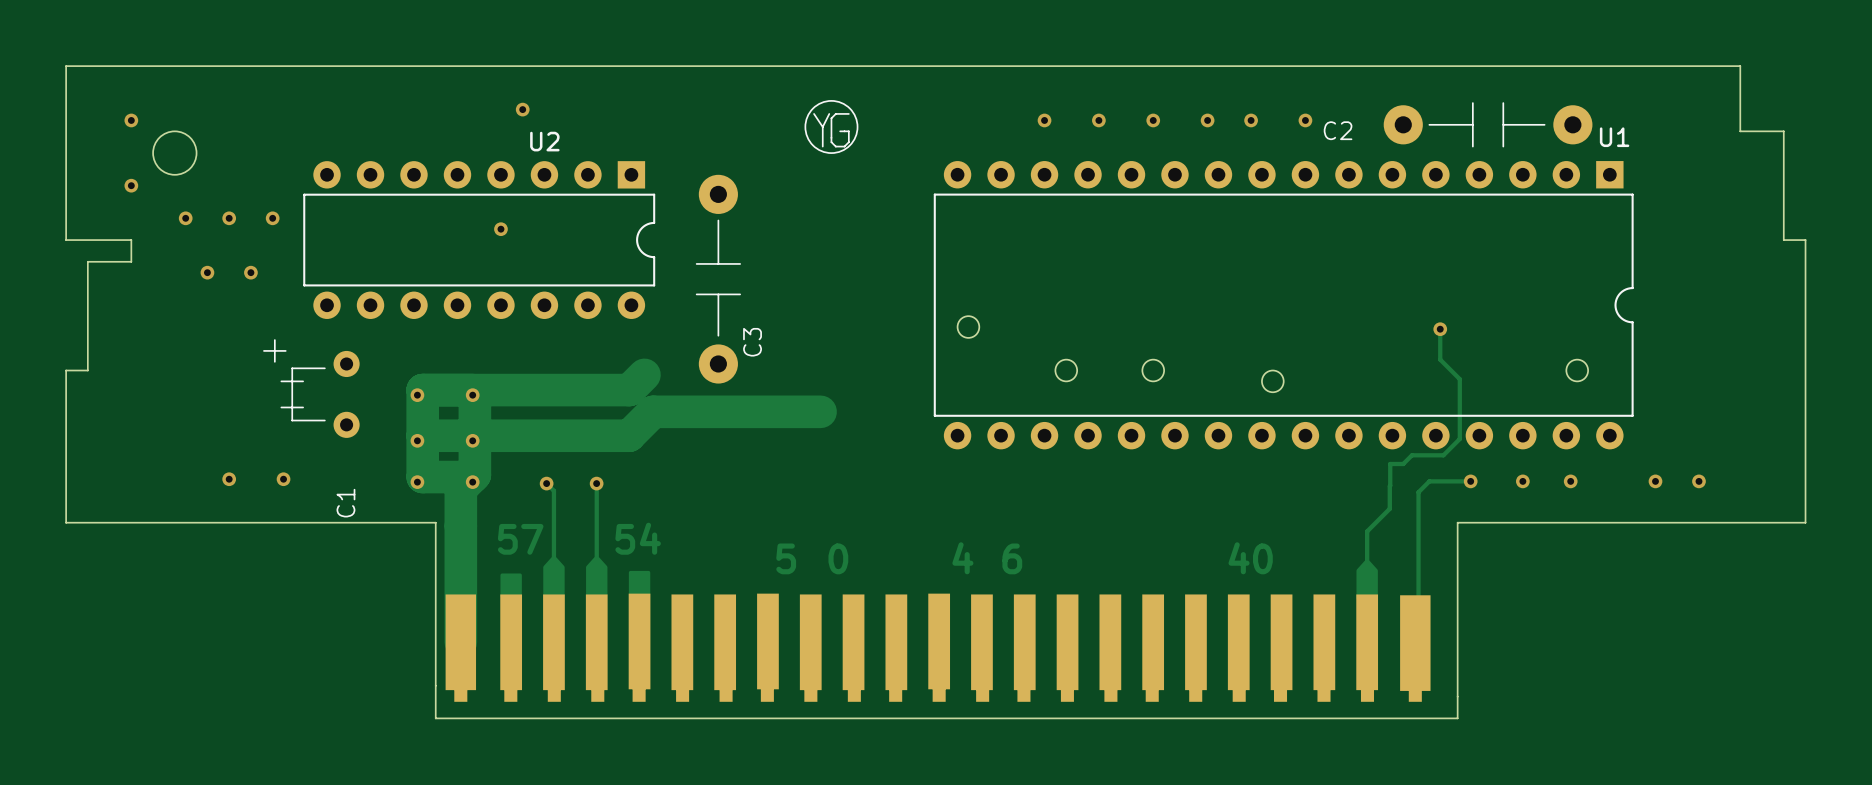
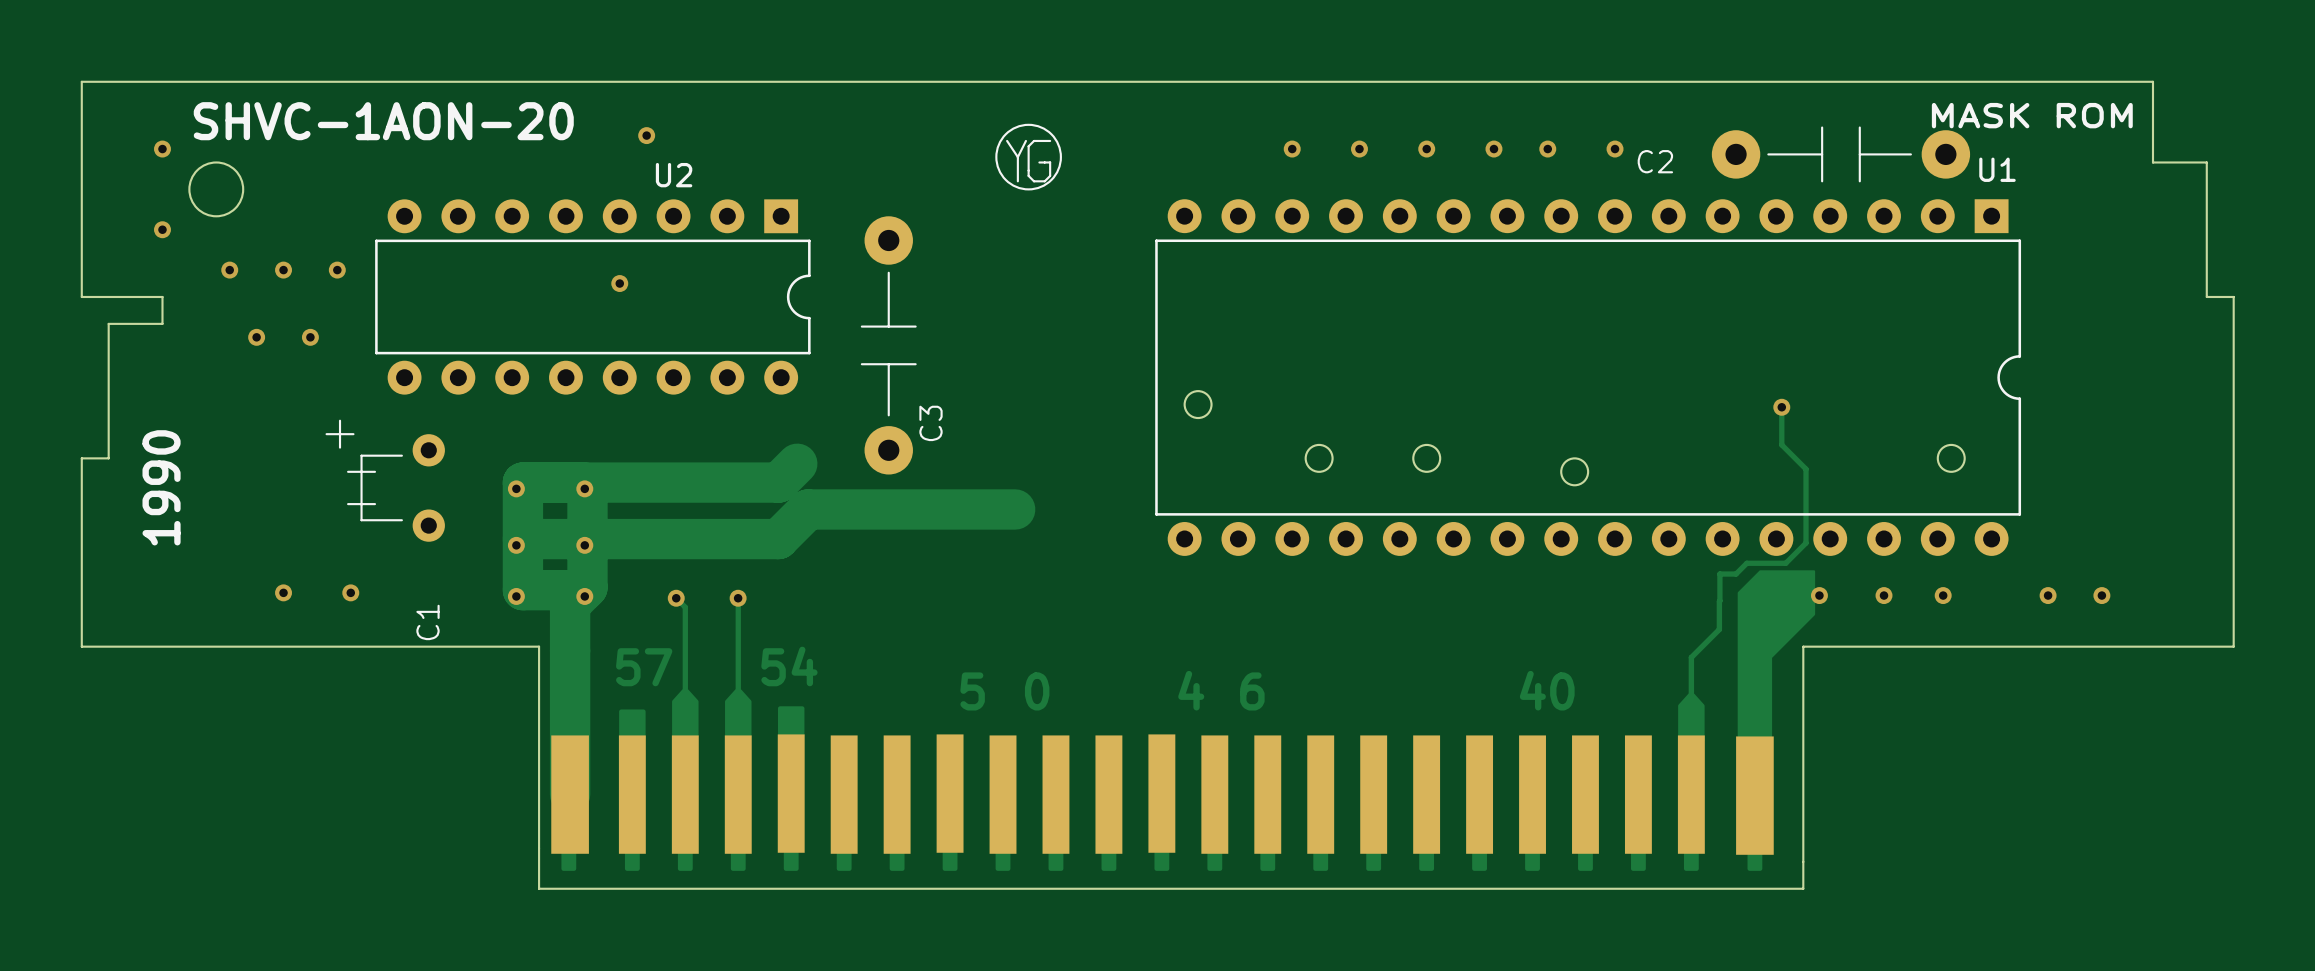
text: none -> MASK ROM (2032, 115)
text: none -> SHVC-1AON-20 (383, 121)
text: none -> 1990 (161, 487)
drawing: none -> [1737, 570, 1816, 745]
part footprint: [445, 593, 1431, 702] -> [551, 734, 1774, 871]

